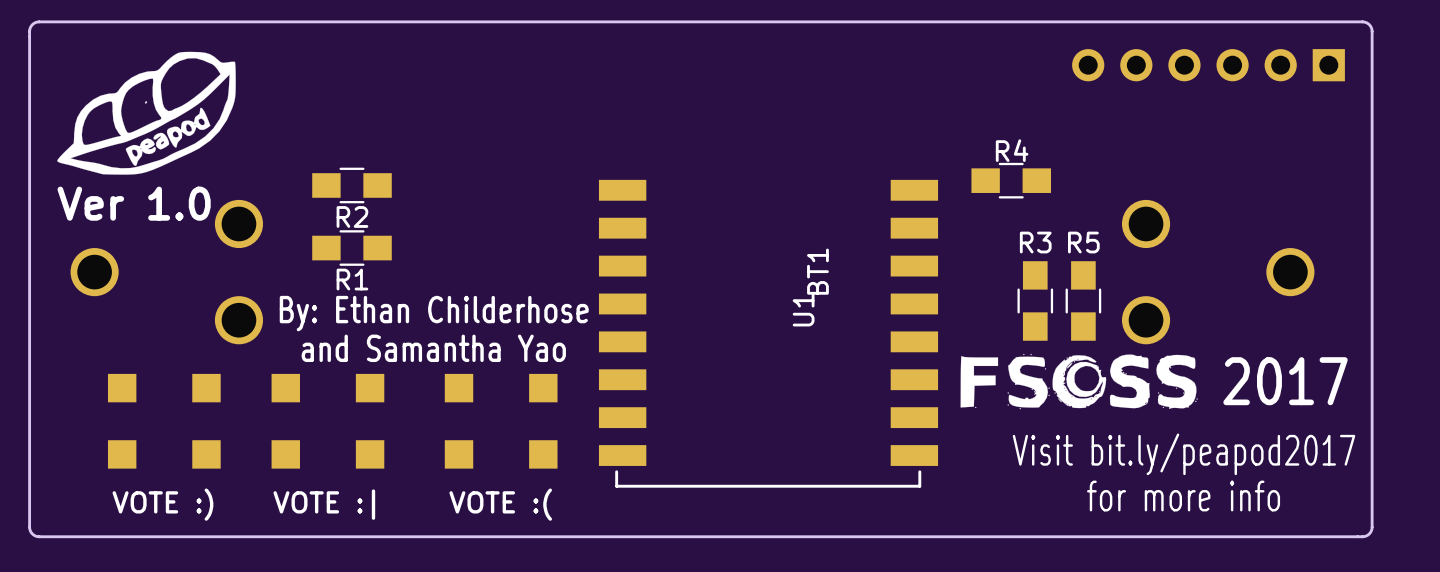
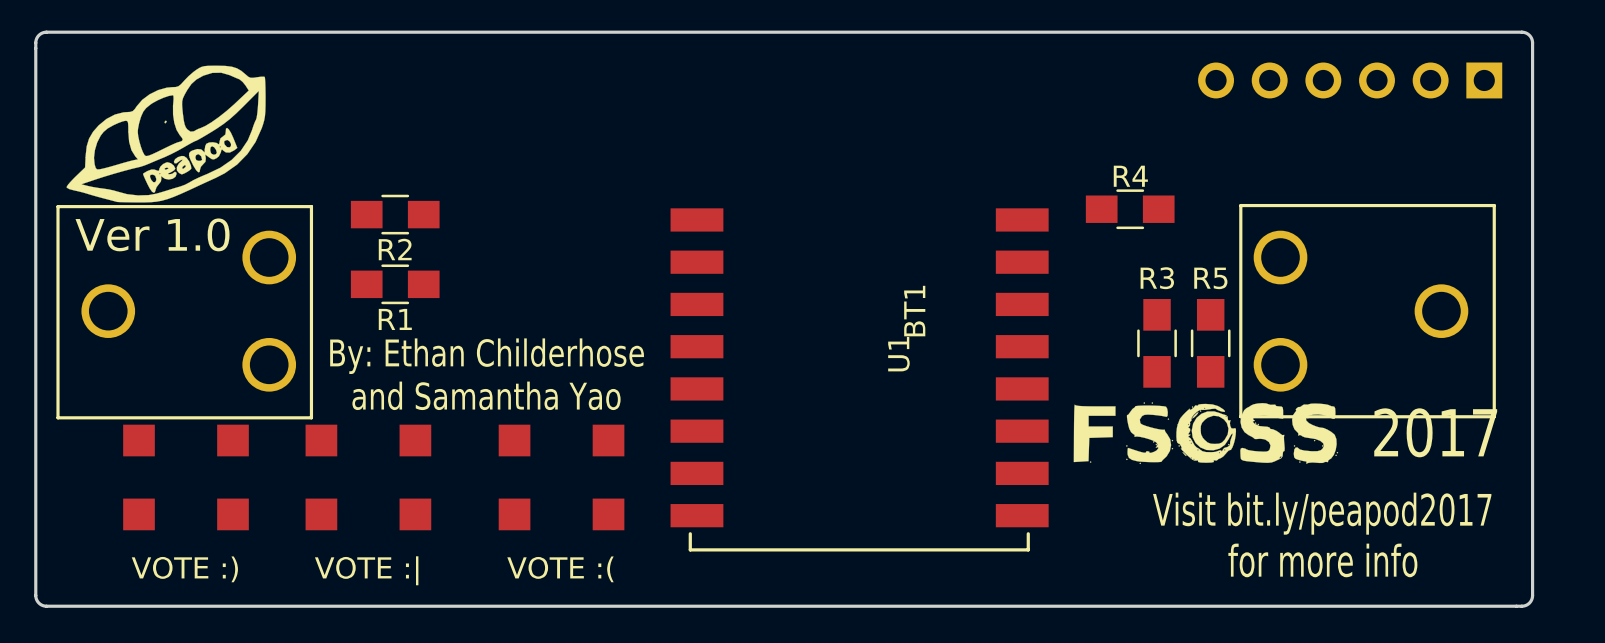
BT1 footprint: [70, 199, 1315, 345] -> [56, 203, 1496, 420]

